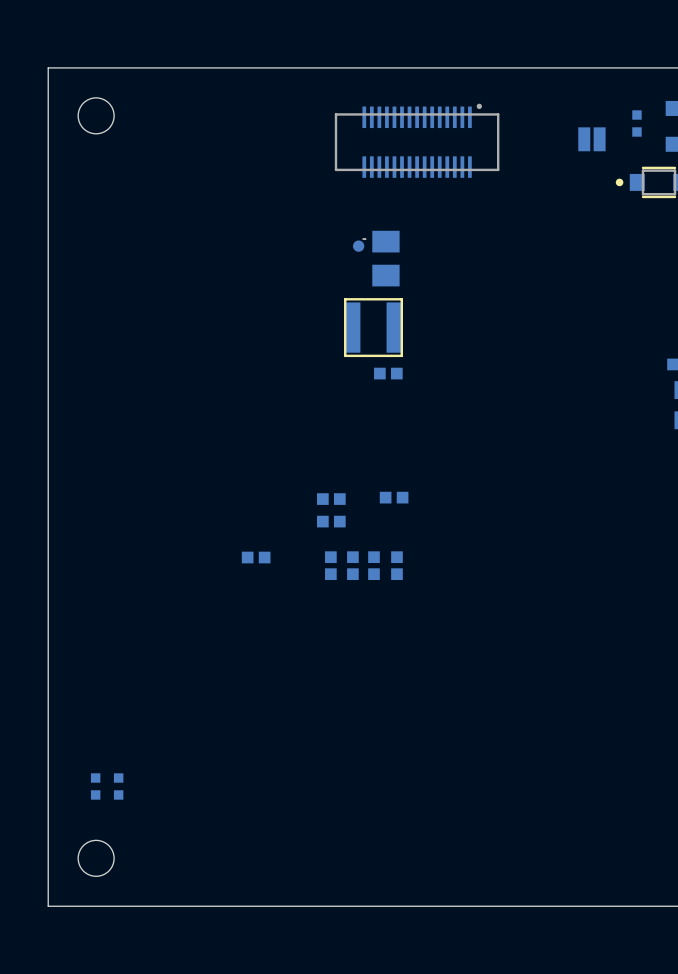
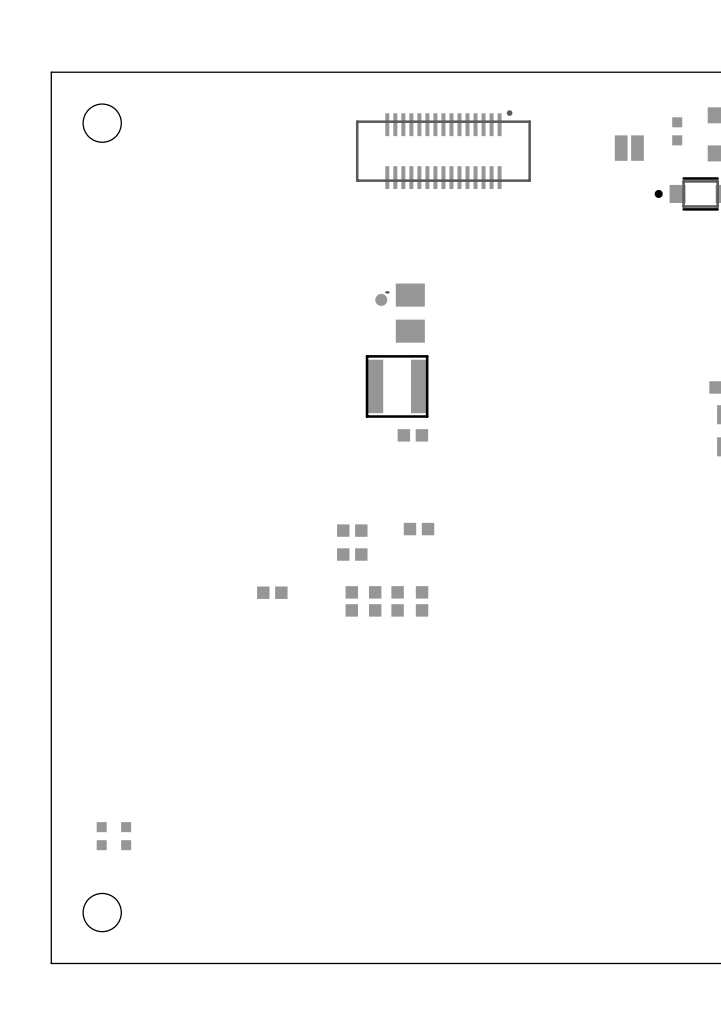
part position: (358, 246) -> (381, 299)
part position: (385, 258) -> (410, 313)
part position: (373, 327) -> (397, 386)
part position: (388, 373) -> (412, 435)

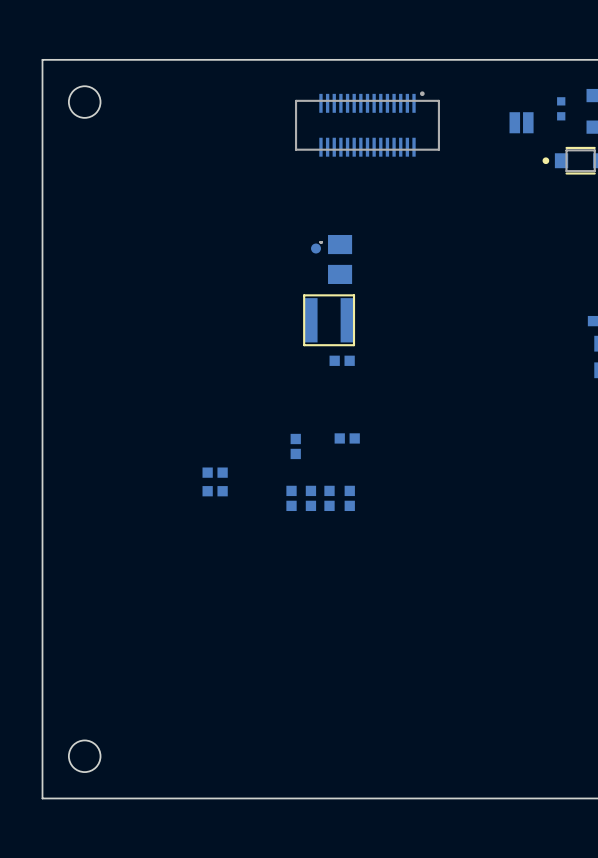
part: (352, 530) -> none
part: none -> (295, 446)
part: (352, 554) -> none
part: none -> (215, 472)
part: none -> (215, 491)
part: (272, 592) -> none
part: (101, 836) -> none
part: (126, 836) -> none

